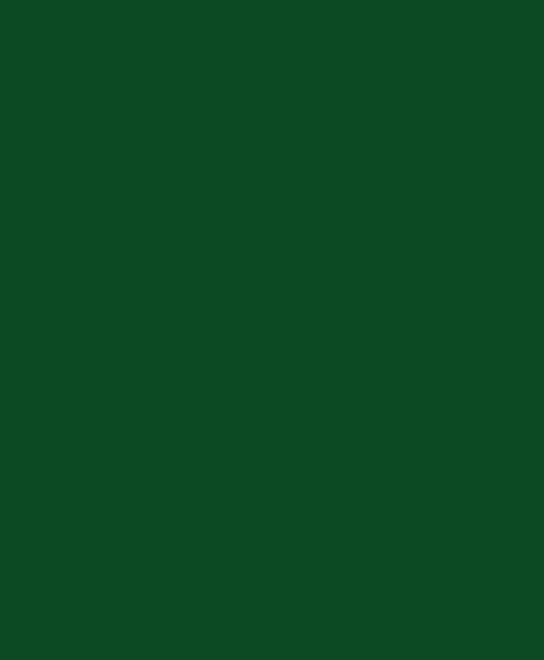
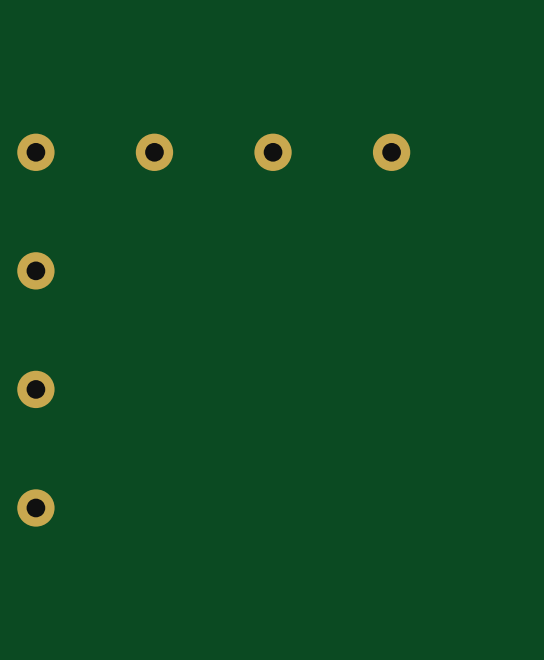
via: none -> (35, 152)
via: none -> (154, 152)
via: none -> (273, 152)
via: none -> (391, 152)
via: none -> (35, 270)
via: none -> (35, 389)
via: none -> (35, 507)

